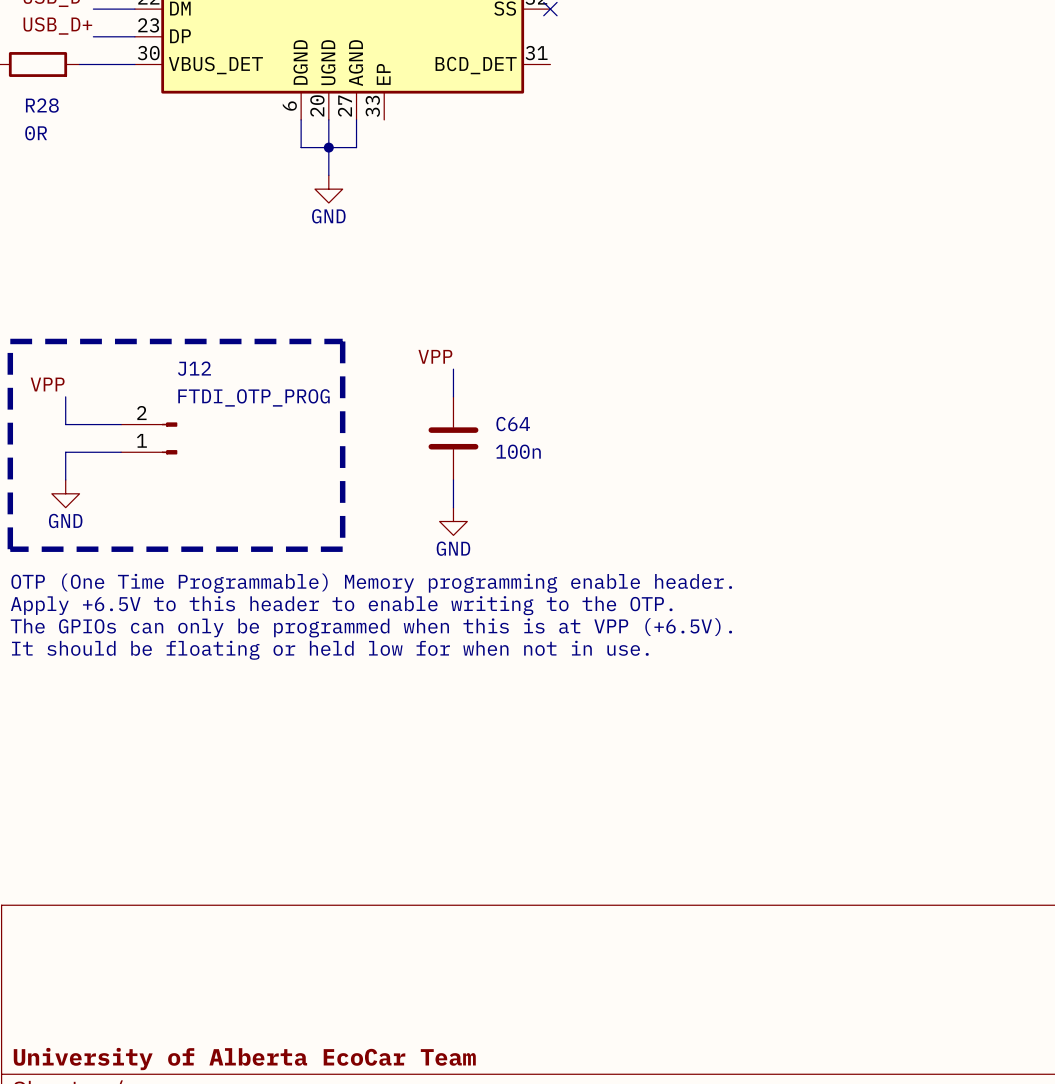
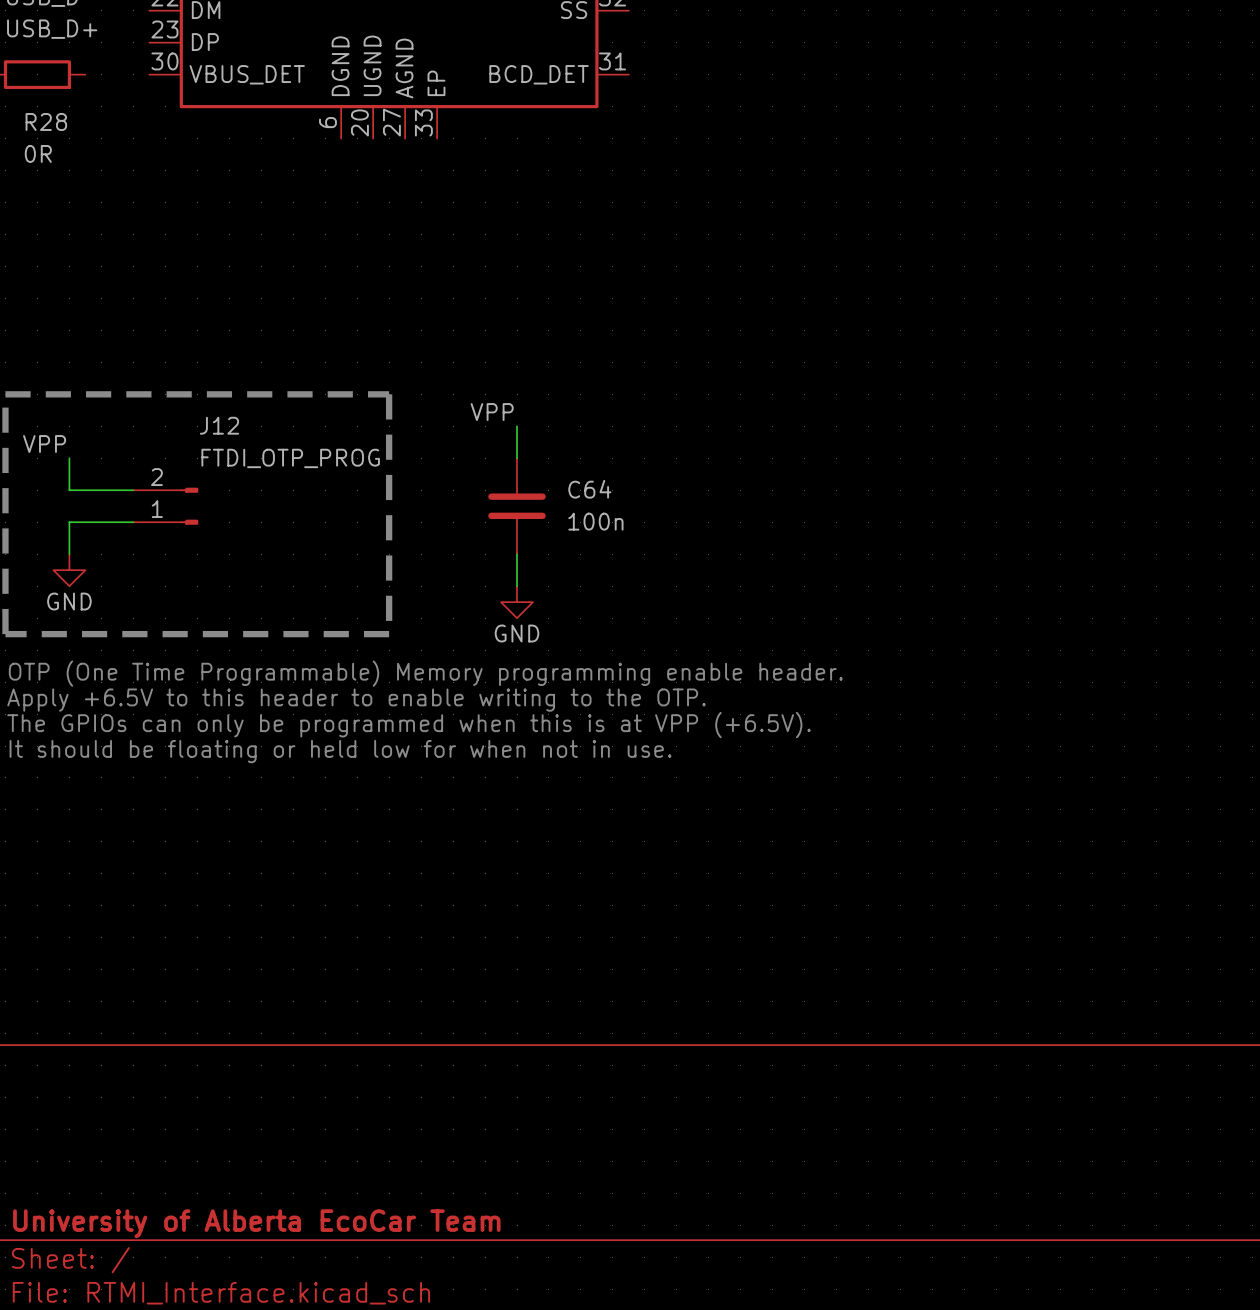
wire: (93, 9) (134, 9) -> none
no-connect mark: (550, 9) -> none
wire: (93, 36) (134, 36) -> none
wire: (79, 64) (134, 64) -> none
wire: (301, 119) (301, 147) (356, 147) (356, 119) -> none
wire: (328, 119) (328, 175) -> none
junction: (328, 147) -> none
power symbol: GND (328, 189) -> none

